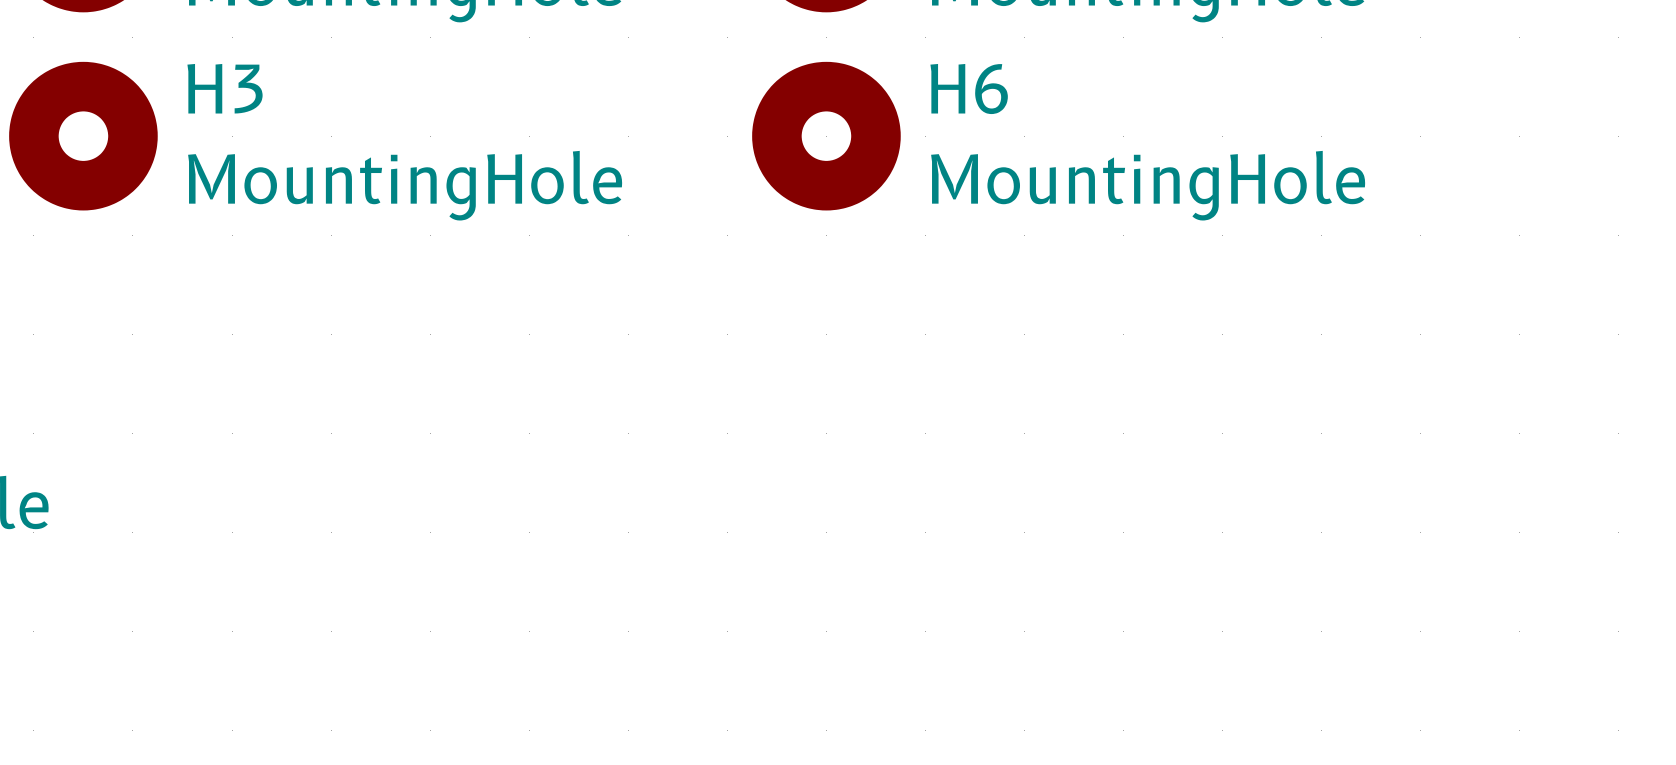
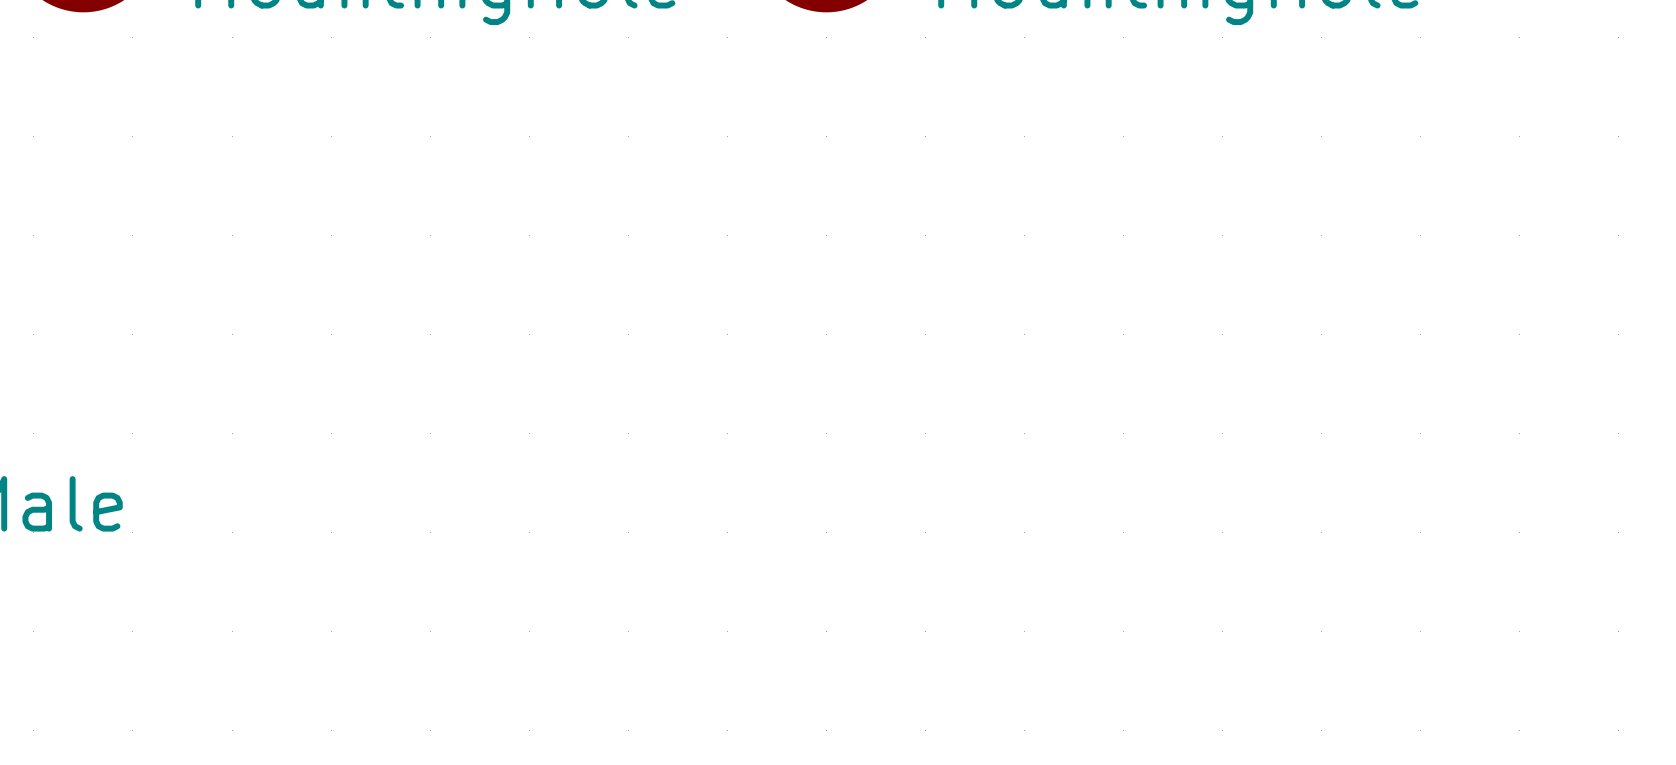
H3: MountingHole (83, 136) -> none
H6: MountingHole (826, 136) -> none

